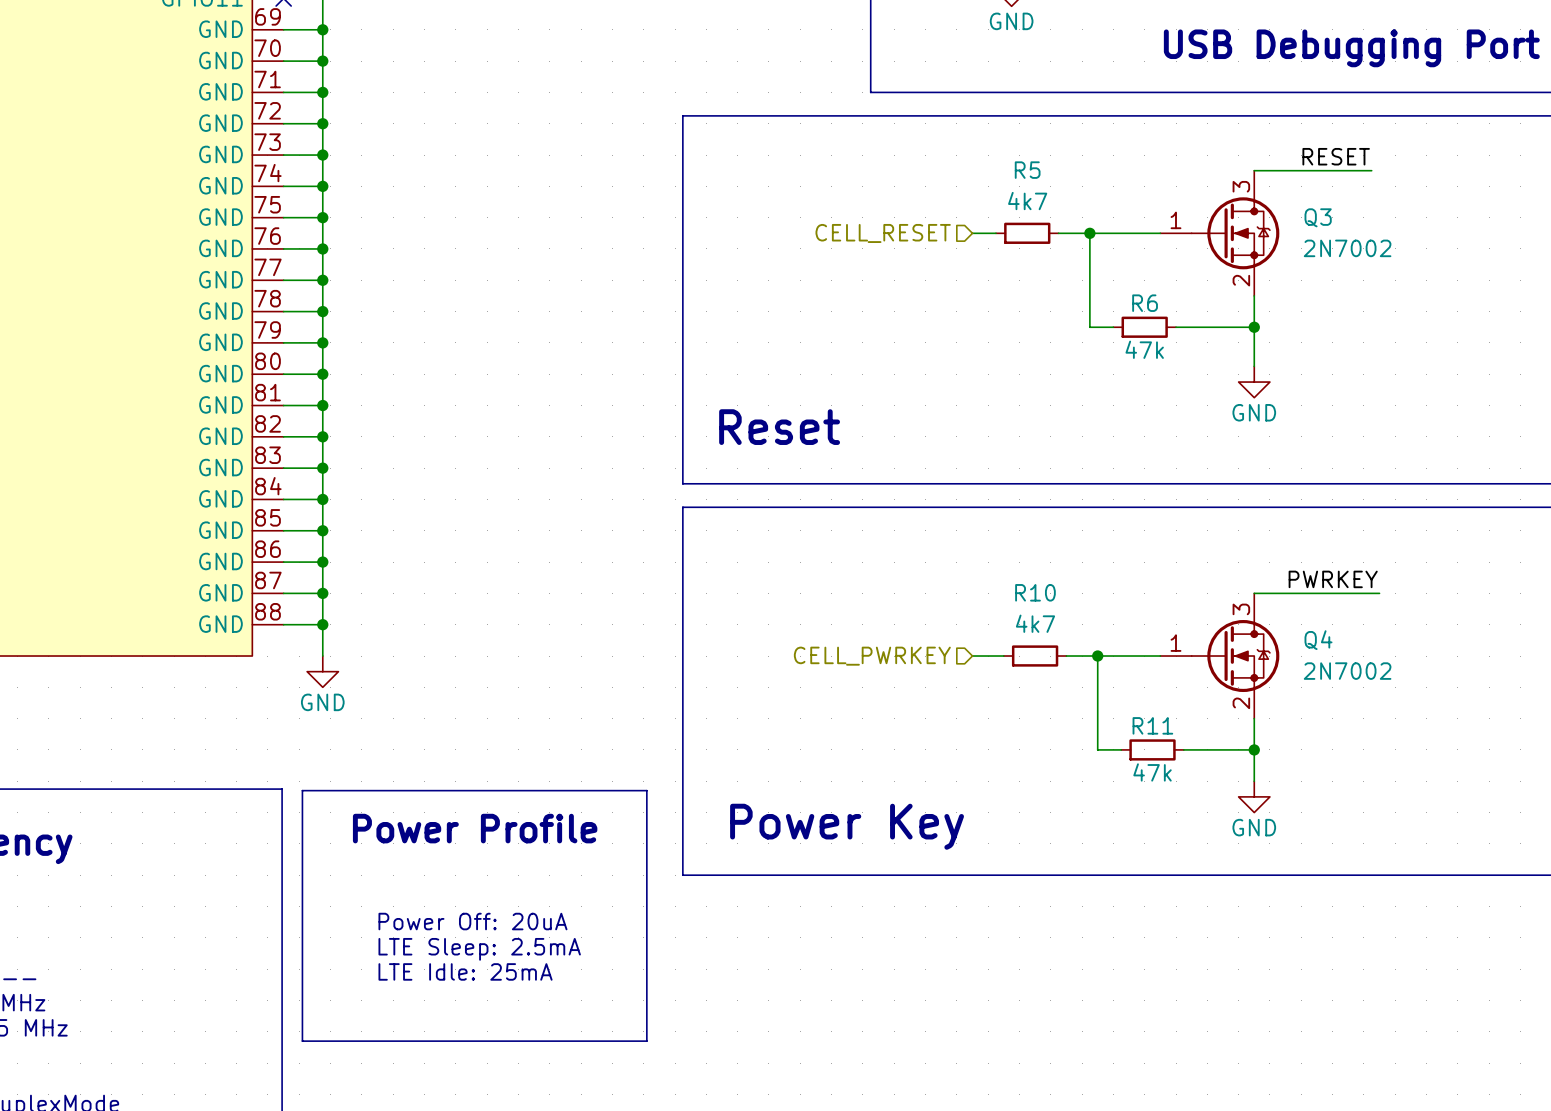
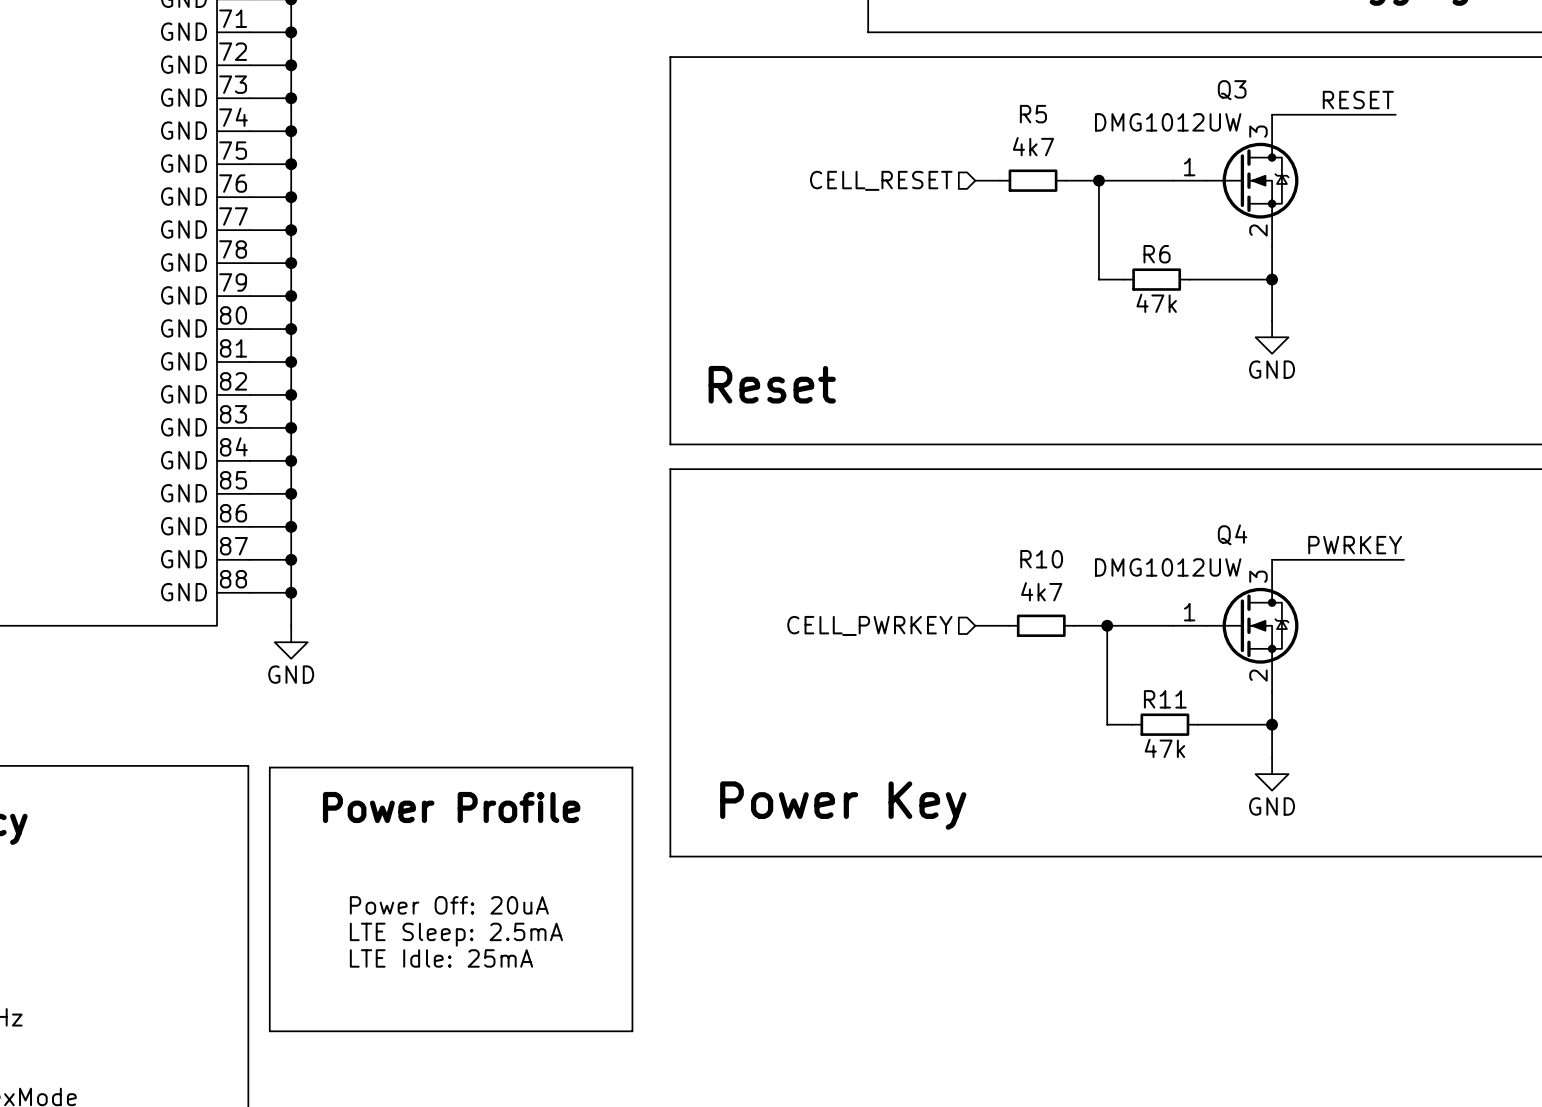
Q3 name position: Q3 (1318, 217) -> Q3 (1232, 90)
Q3 value: 2N7002 (1347, 248) -> DMG1012UW (1168, 122)
Q4 name position: Q4 (1318, 640) -> Q4 (1232, 534)
Q4 value: 2N7002 (1347, 671) -> DMG1012UW (1168, 567)

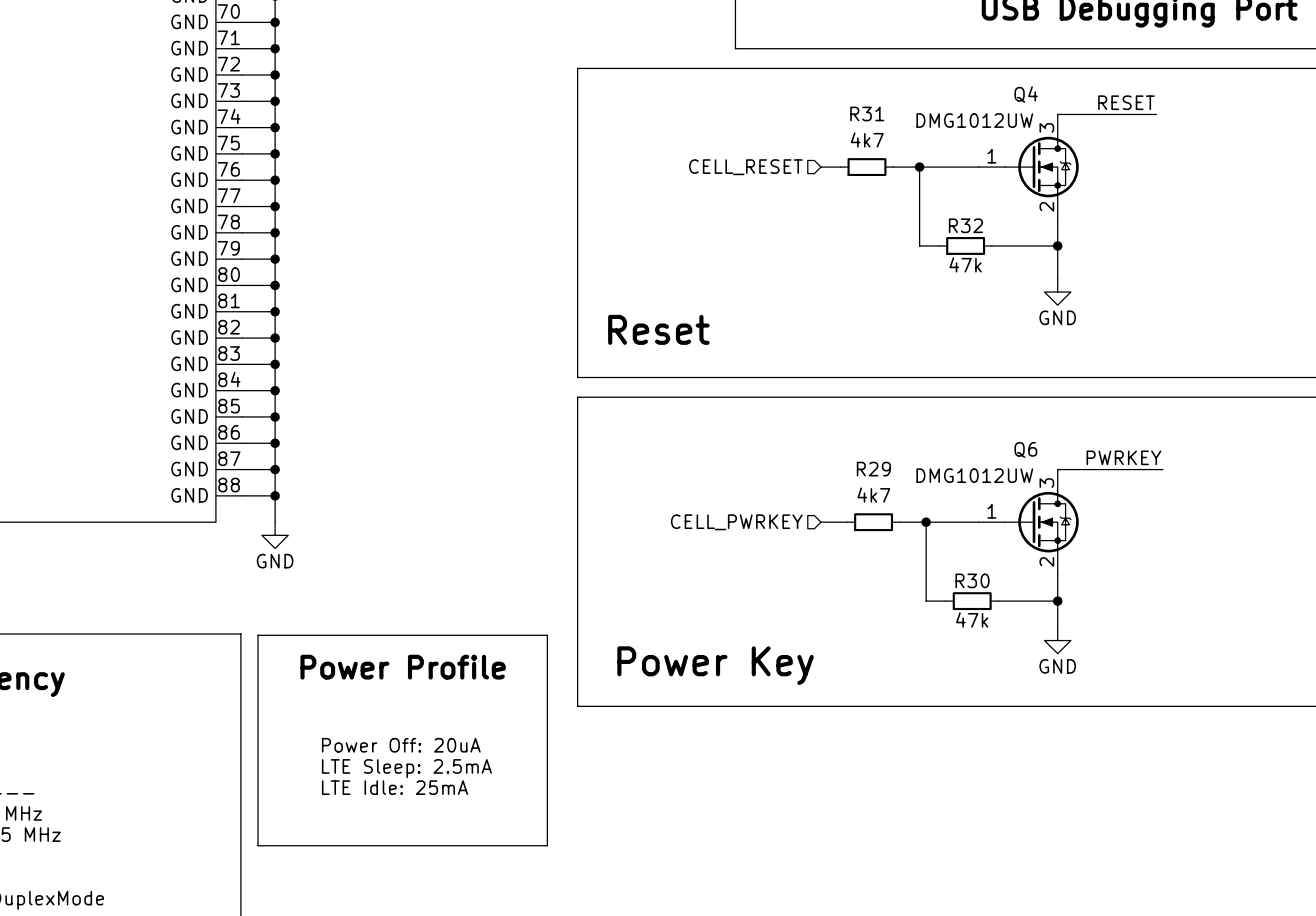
Q3 name: Q3 (1232, 90) -> Q4 (1026, 94)
R5 name: R5 (1033, 114) -> R31 (867, 113)
R6 name: R6 (1157, 254) -> R32 (965, 225)
Q4 name: Q4 (1232, 534) -> Q6 (1025, 449)
R10 name: R10 (1041, 559) -> R29 (873, 469)
R11 name: R11 (1165, 699) -> R30 (972, 580)

